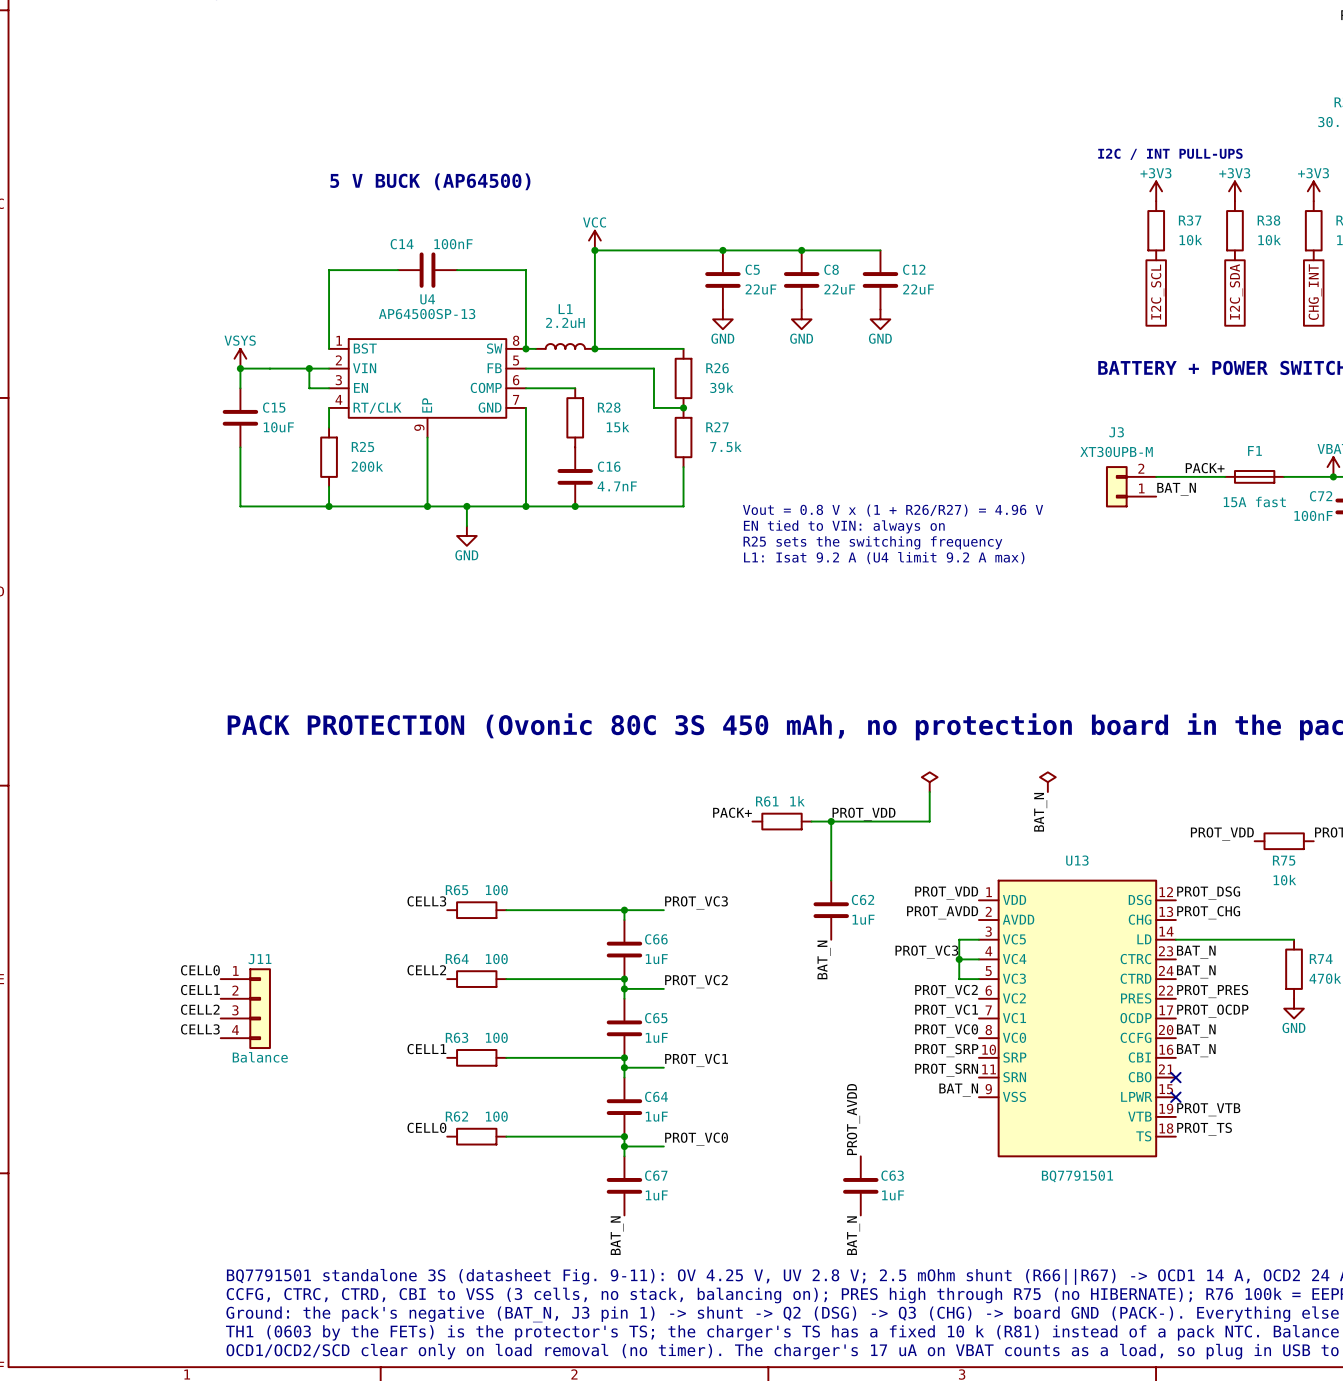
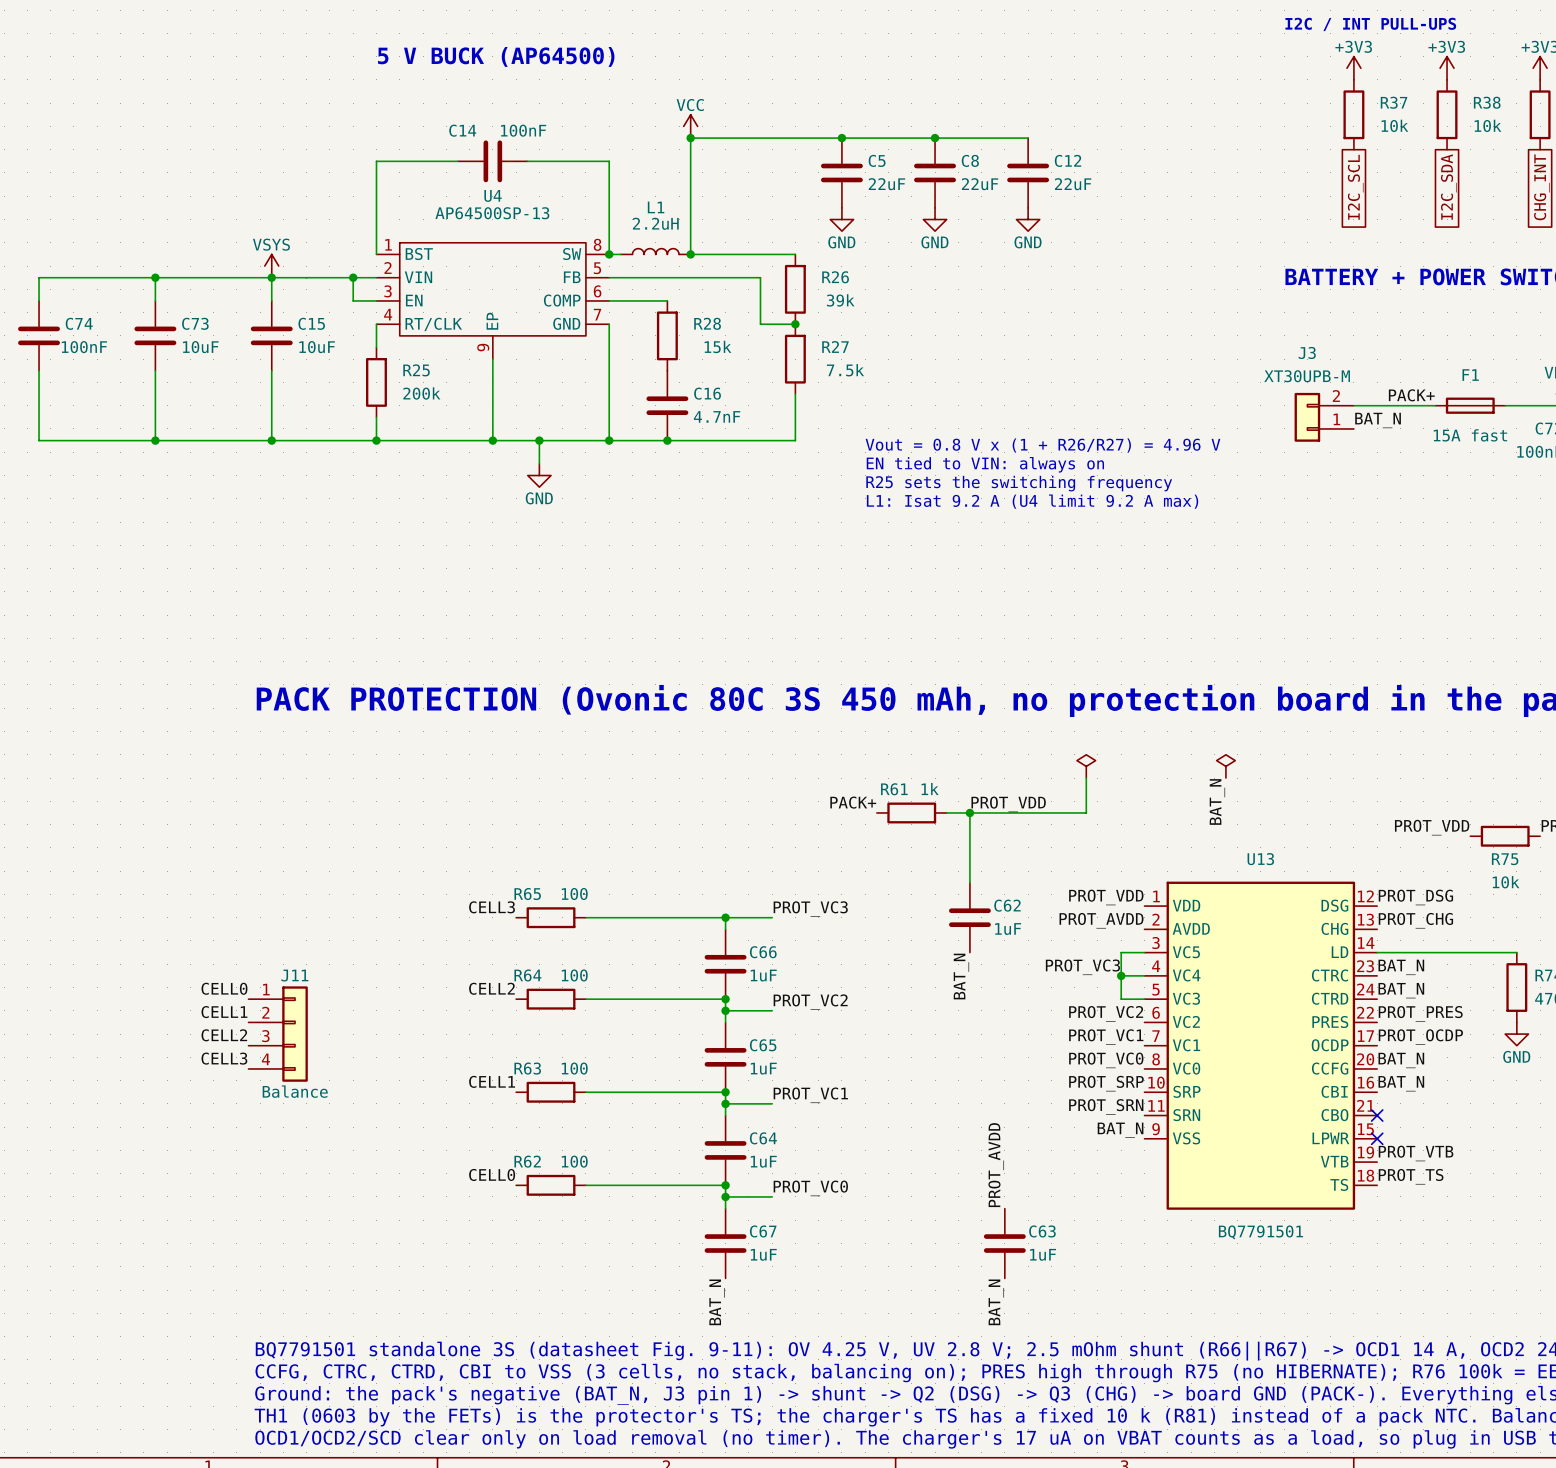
wire: none -> (155, 277) (155, 300)
junction: none -> (155, 277)
wire: none -> (271, 277) (39, 277) (39, 300)
C74: none -> 100nF (39, 335)
C73: none -> 10uF (155, 335)
wire: none -> (39, 370) (39, 440) (271, 440)
wire: none -> (155, 370) (155, 440)
junction: none -> (155, 440)
junction: none -> (271, 440)

